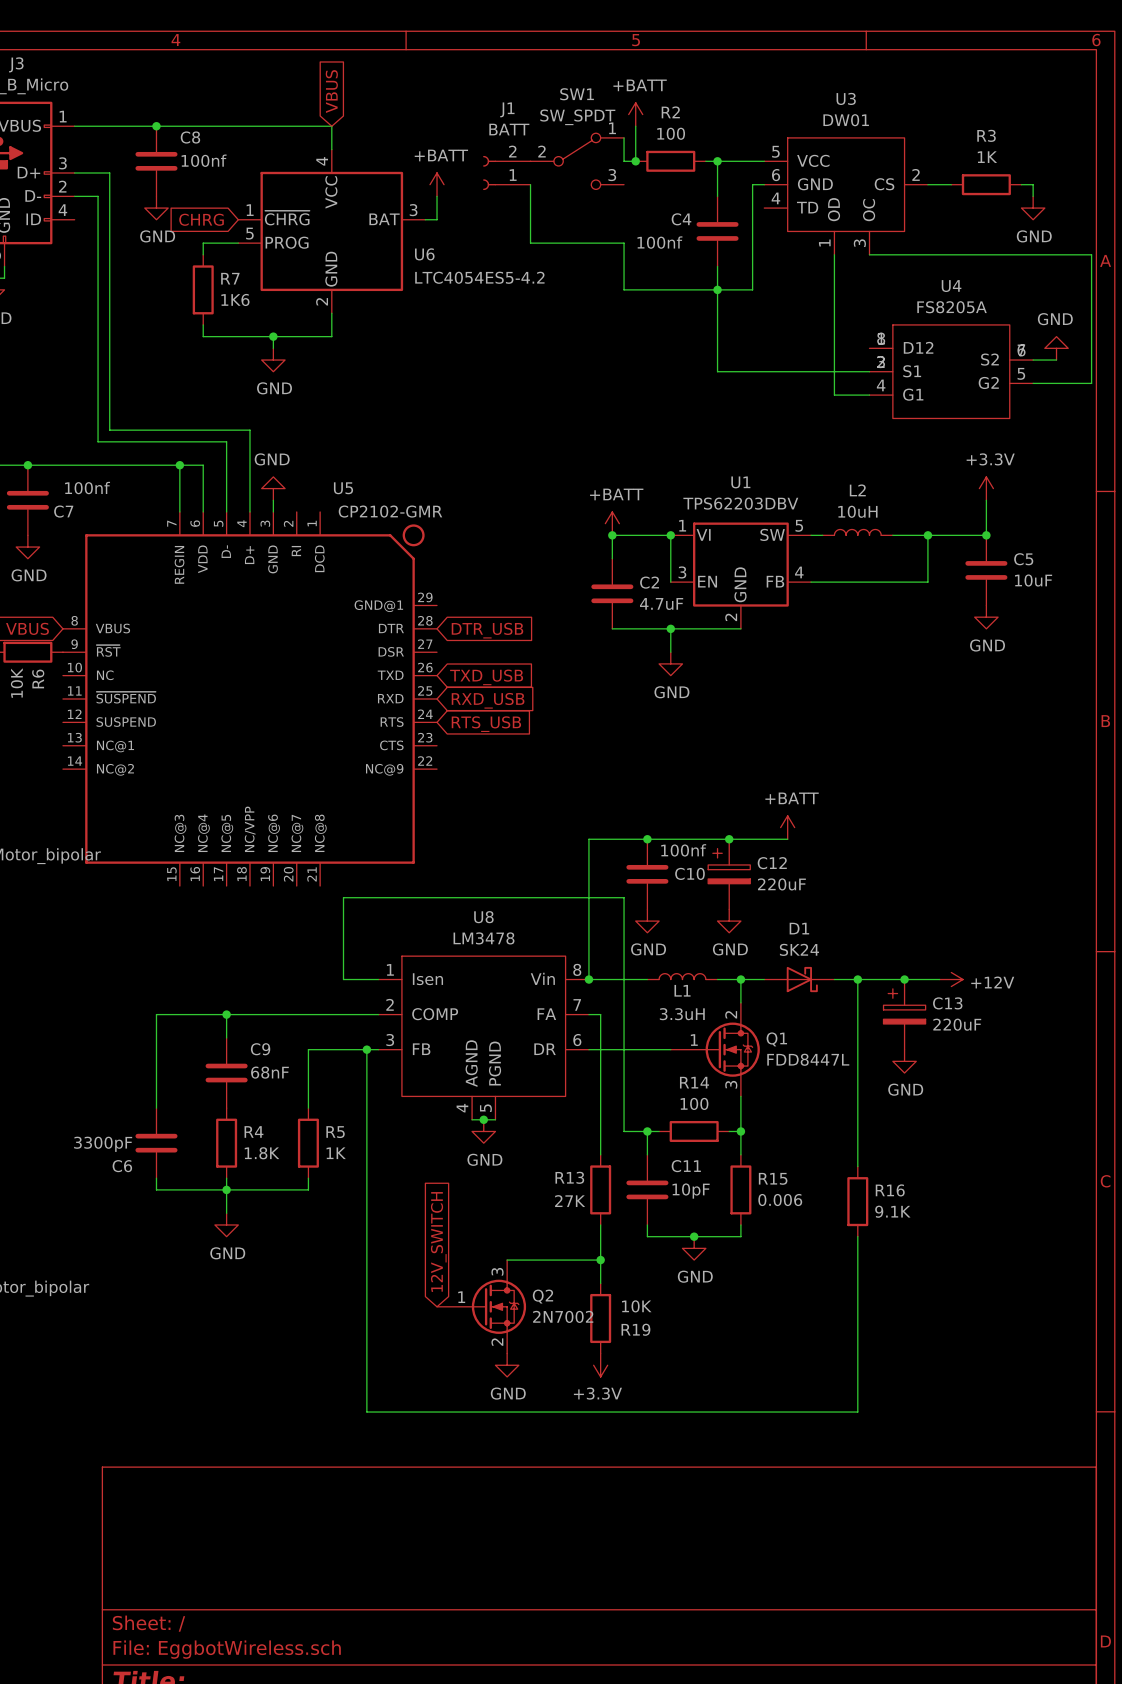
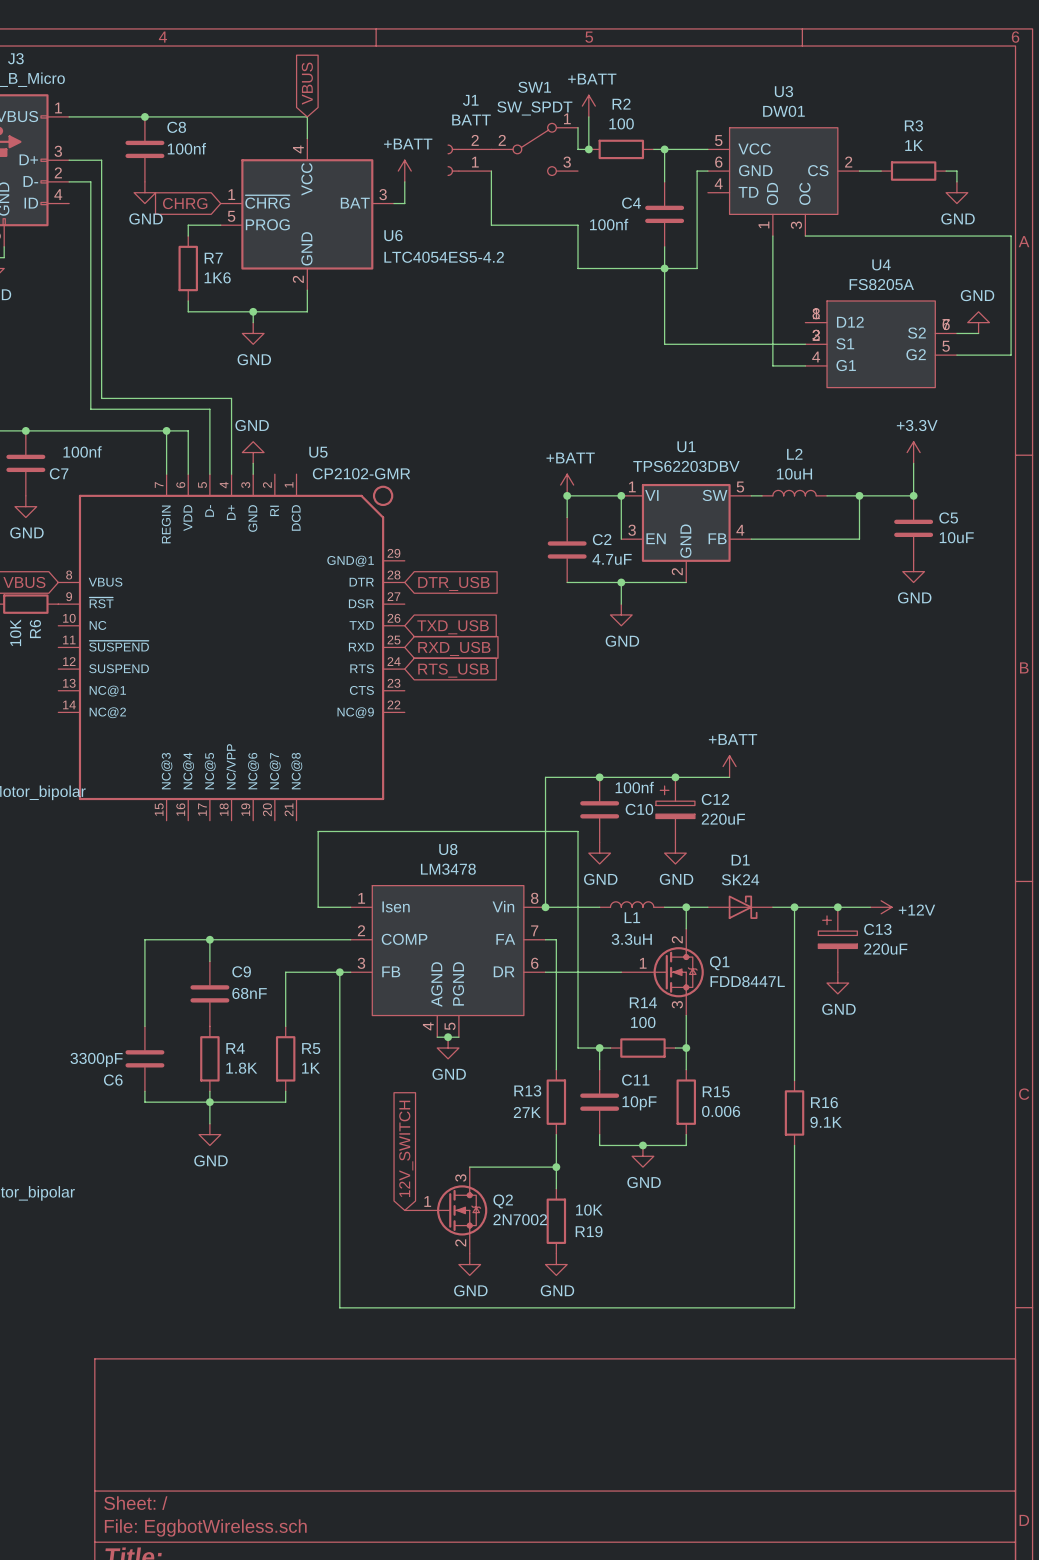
power symbol: +3.3V (600, 1365) -> GND (556, 1264)

